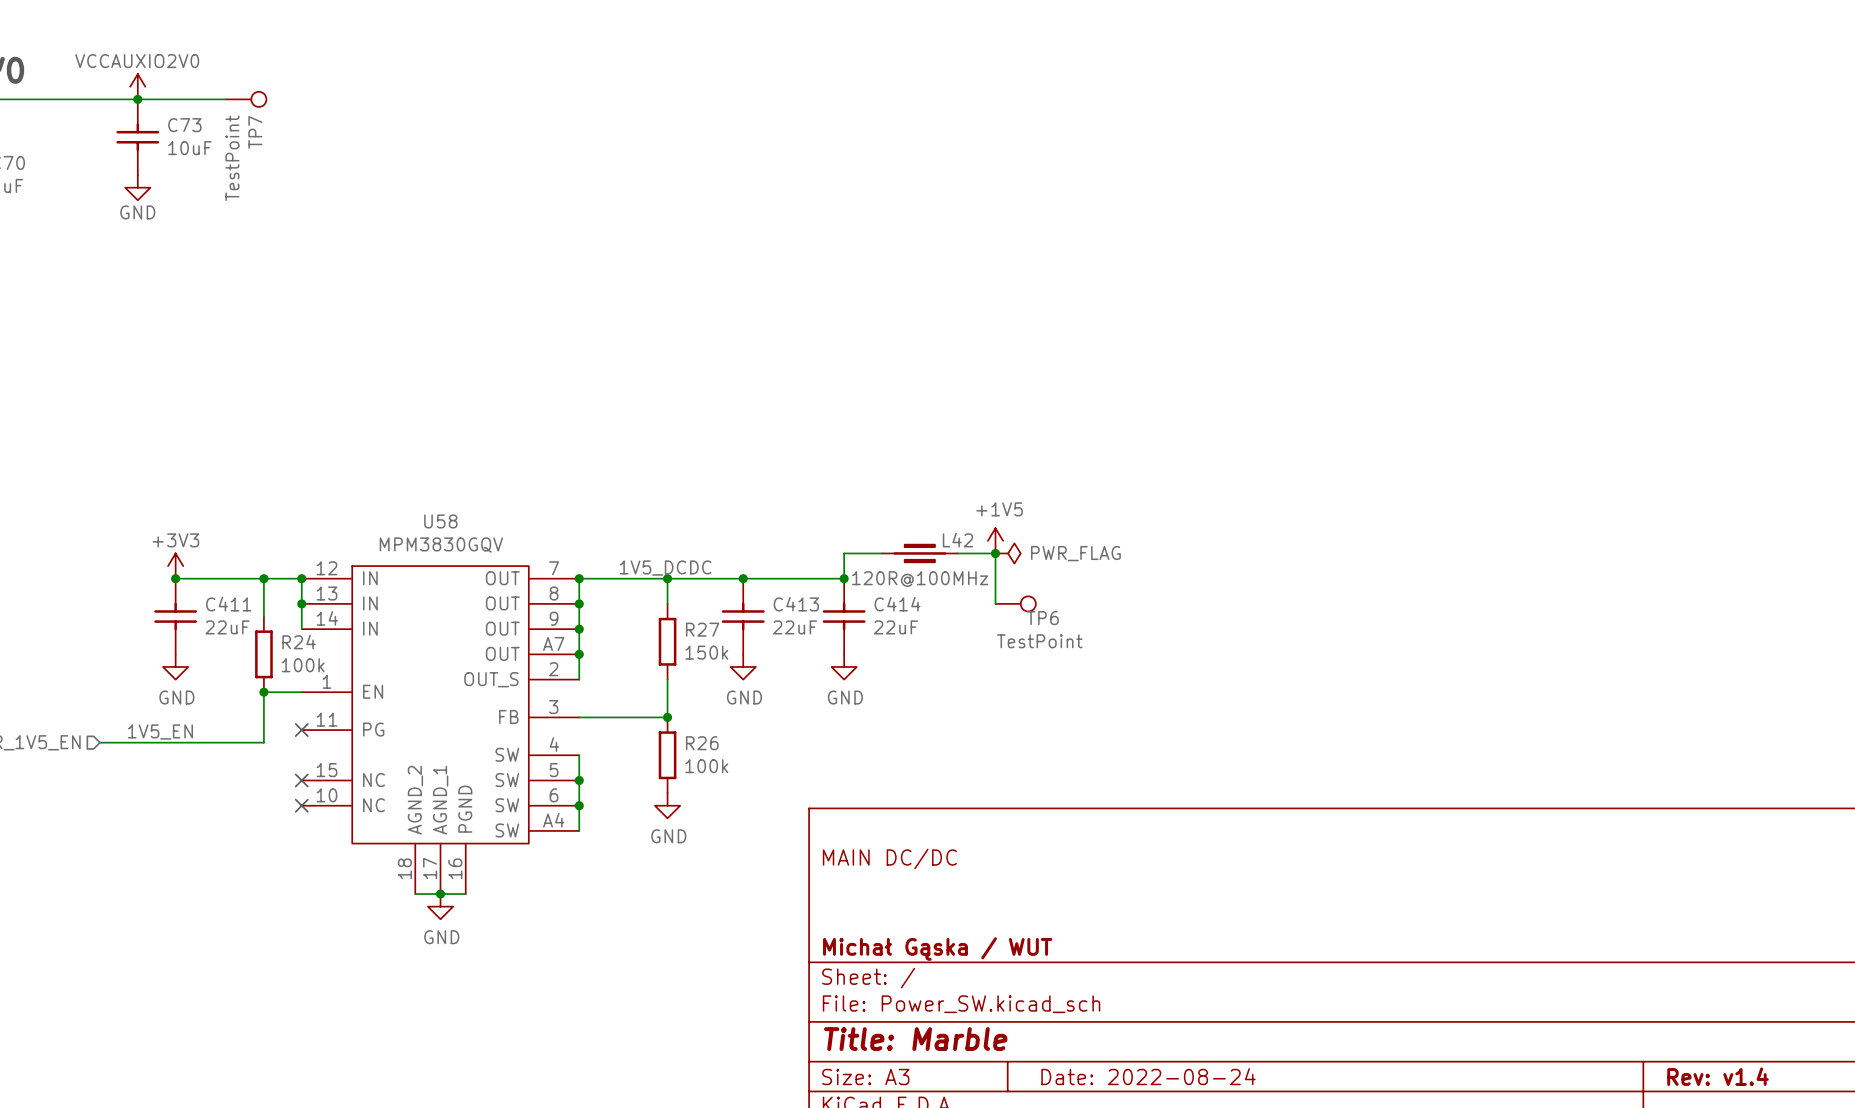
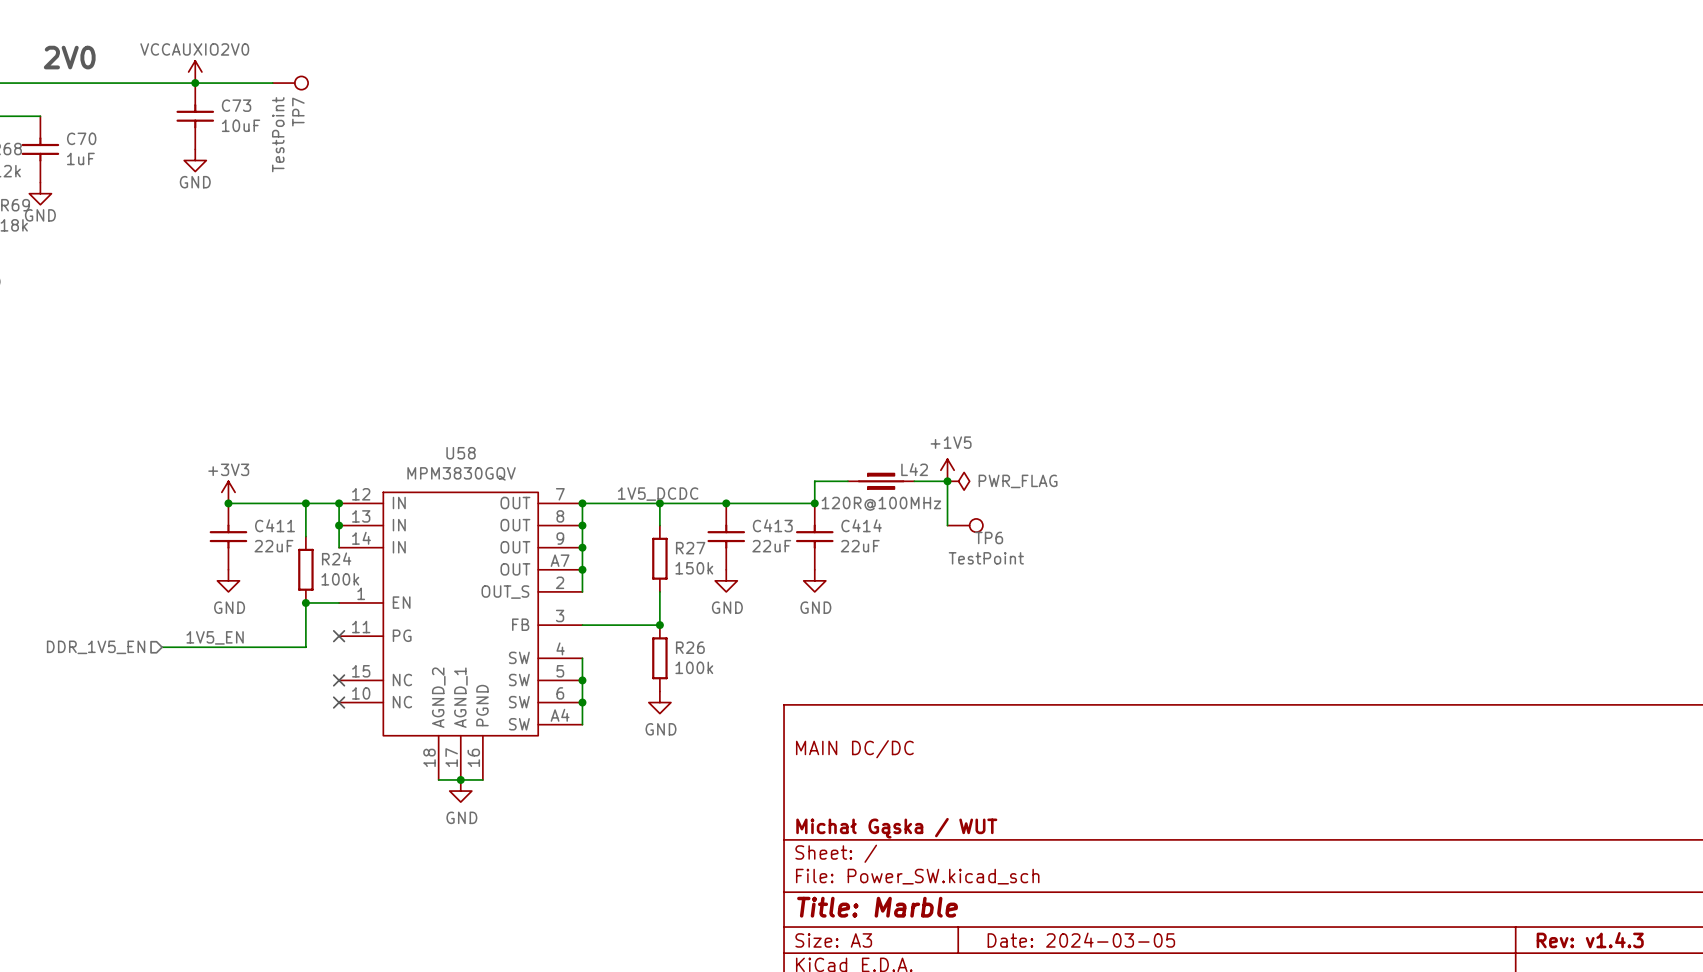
title block: Date: 2022-08-24 (1148, 1076) -> Date: 2024-03-05 (1081, 940)
title block: Rev: v1.4 (1718, 1076) -> Rev: v1.4.3 (1590, 940)

